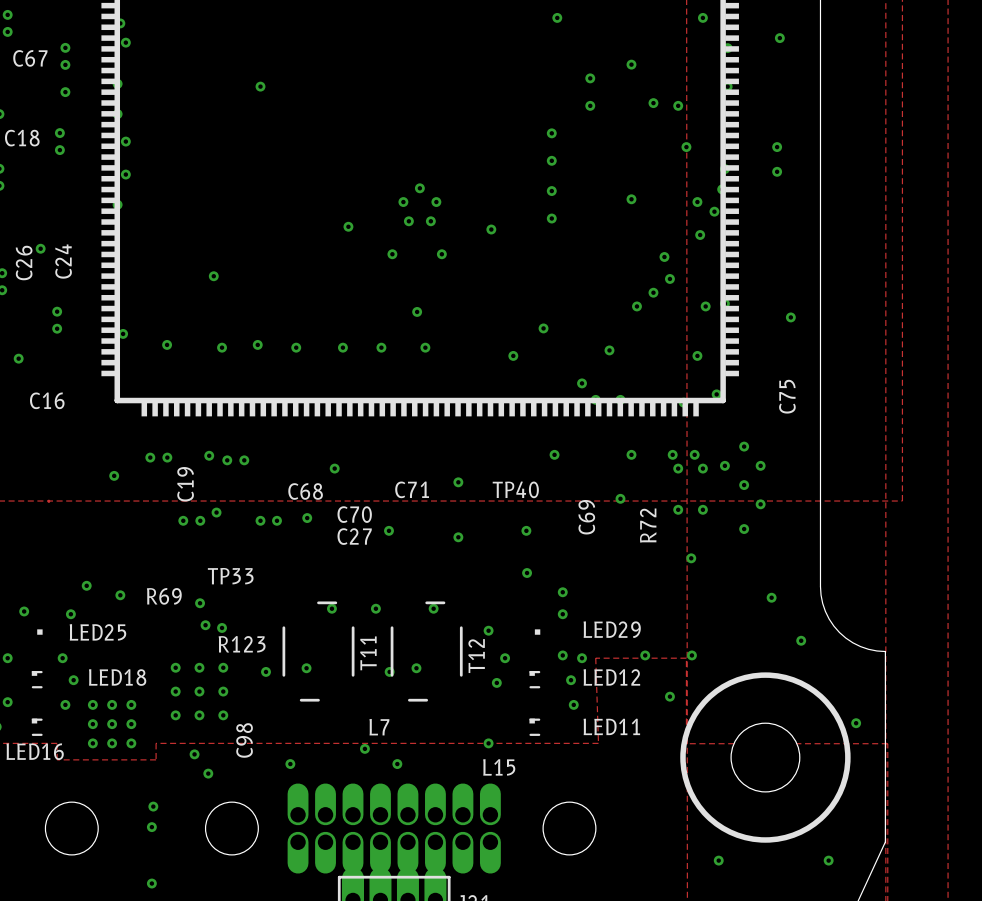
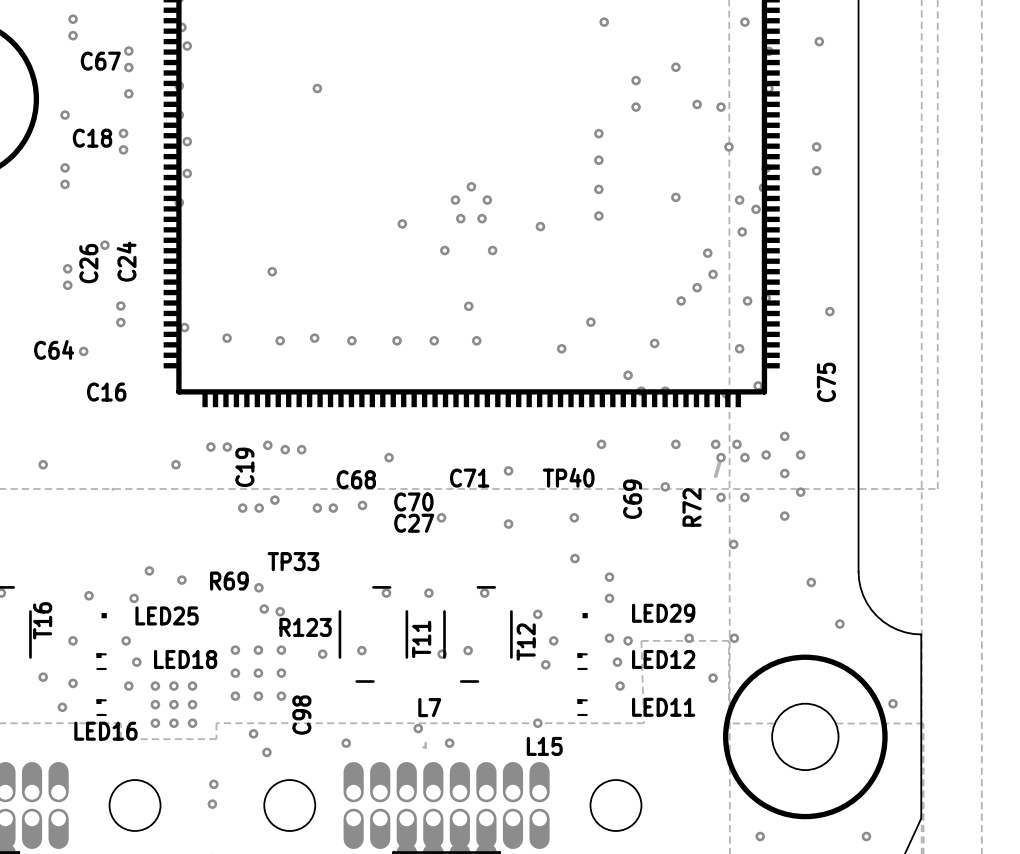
track: none -> (721, 457) (715, 476)
track: none -> (425, 743) (425, 747) (423, 747)

